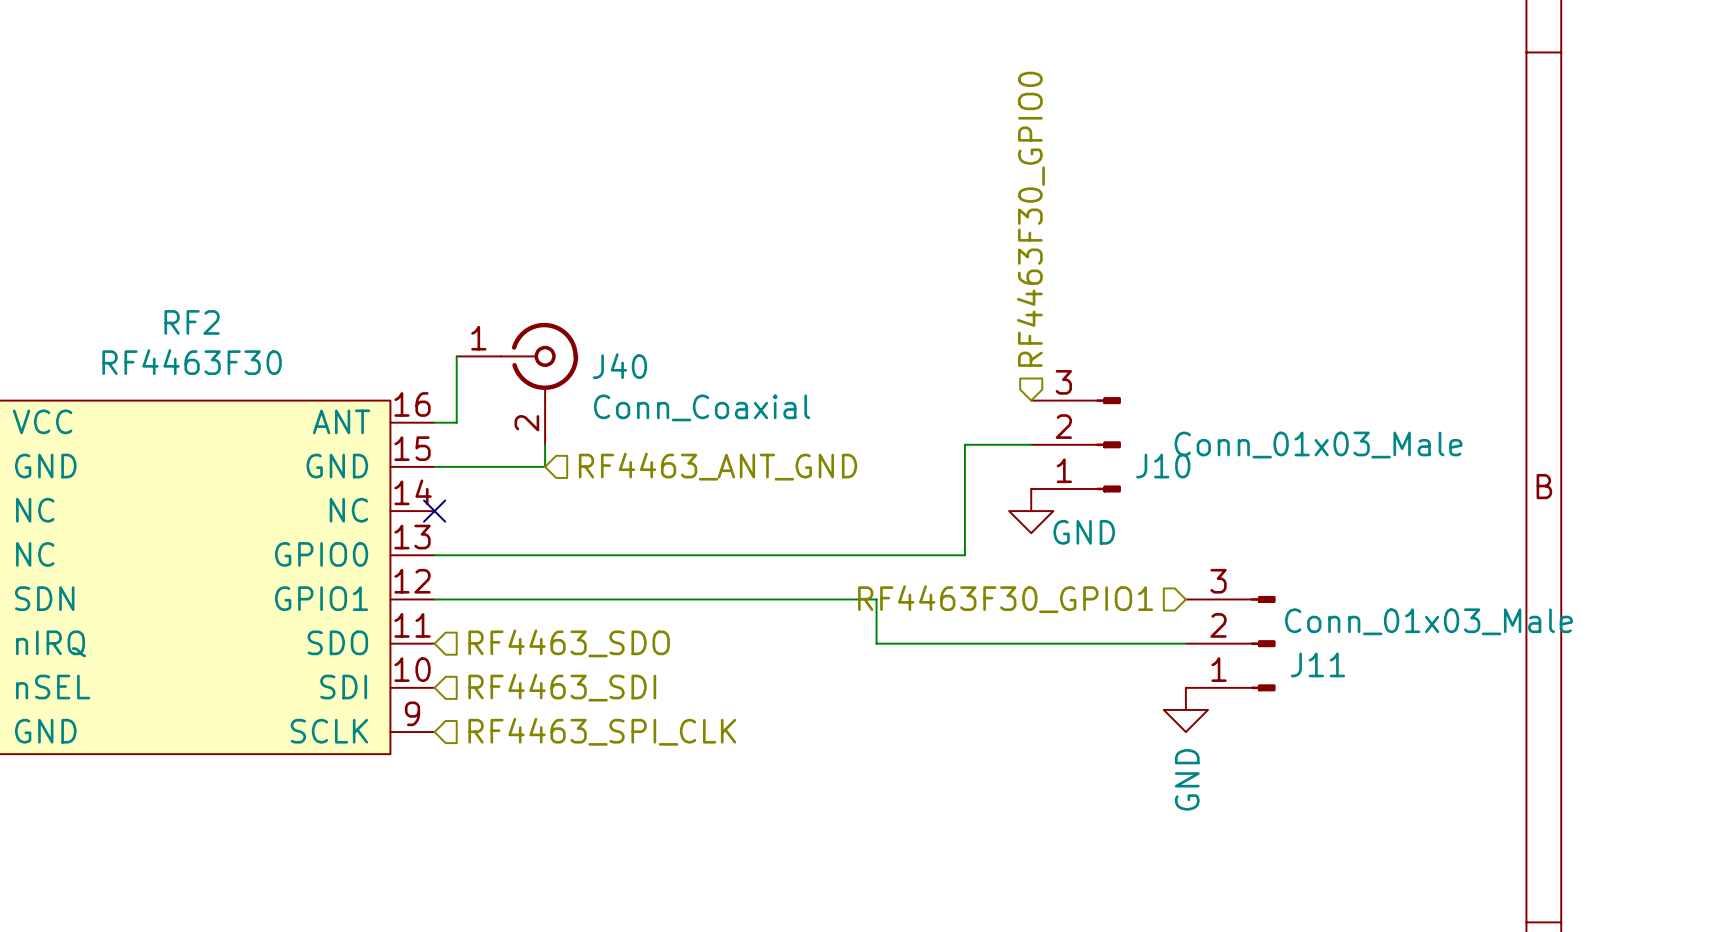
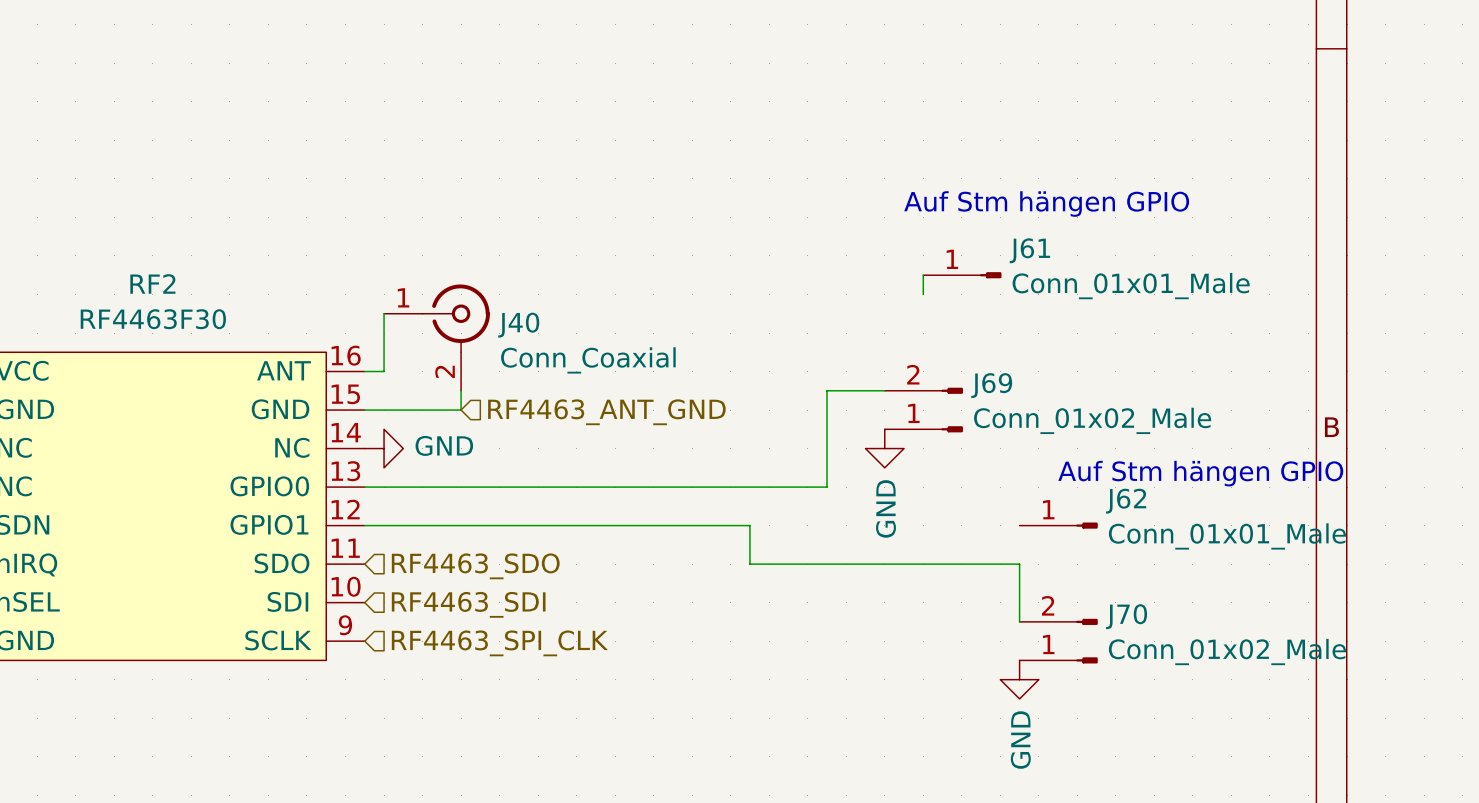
hierarchical label: RF4463F30_GPIO0 (1030, 219) -> none
text: none -> Auf Stm hängen GPIO (1046, 204)
wire: none -> (923, 275) (923, 294)
J61: none -> Conn_01x01_Male (962, 275)
J10: Conn_01x03_Male (1076, 444) -> none
J69: none -> Conn_01x02_Male (923, 410)
no-connect mark: (434, 511) -> none
power symbol: none -> GND (384, 448)
power symbol text rotation: 0° (1084, 532) -> 90° counterclockwise (885, 508)
text: none -> Auf Stm hängen GPIO (1200, 473)
hierarchical label: RF4463F30_GPIO1 (1005, 599) -> none
J62: none -> Conn_01x01_Male (1058, 525)
wire: none -> (1019, 564) (1019, 621)
J11: Conn_01x03_Male (1230, 643) -> none
power symbol position: GND (1185, 709) -> GND (1019, 679)
J70: none -> Conn_01x02_Male (1058, 641)

